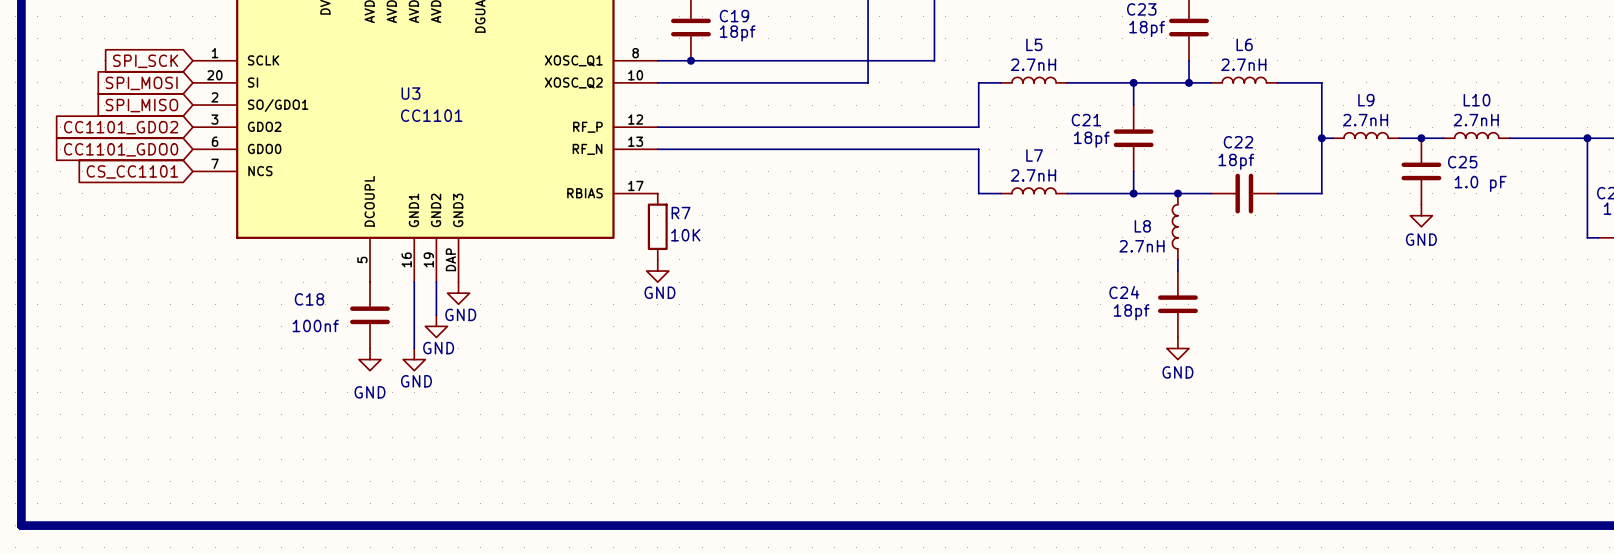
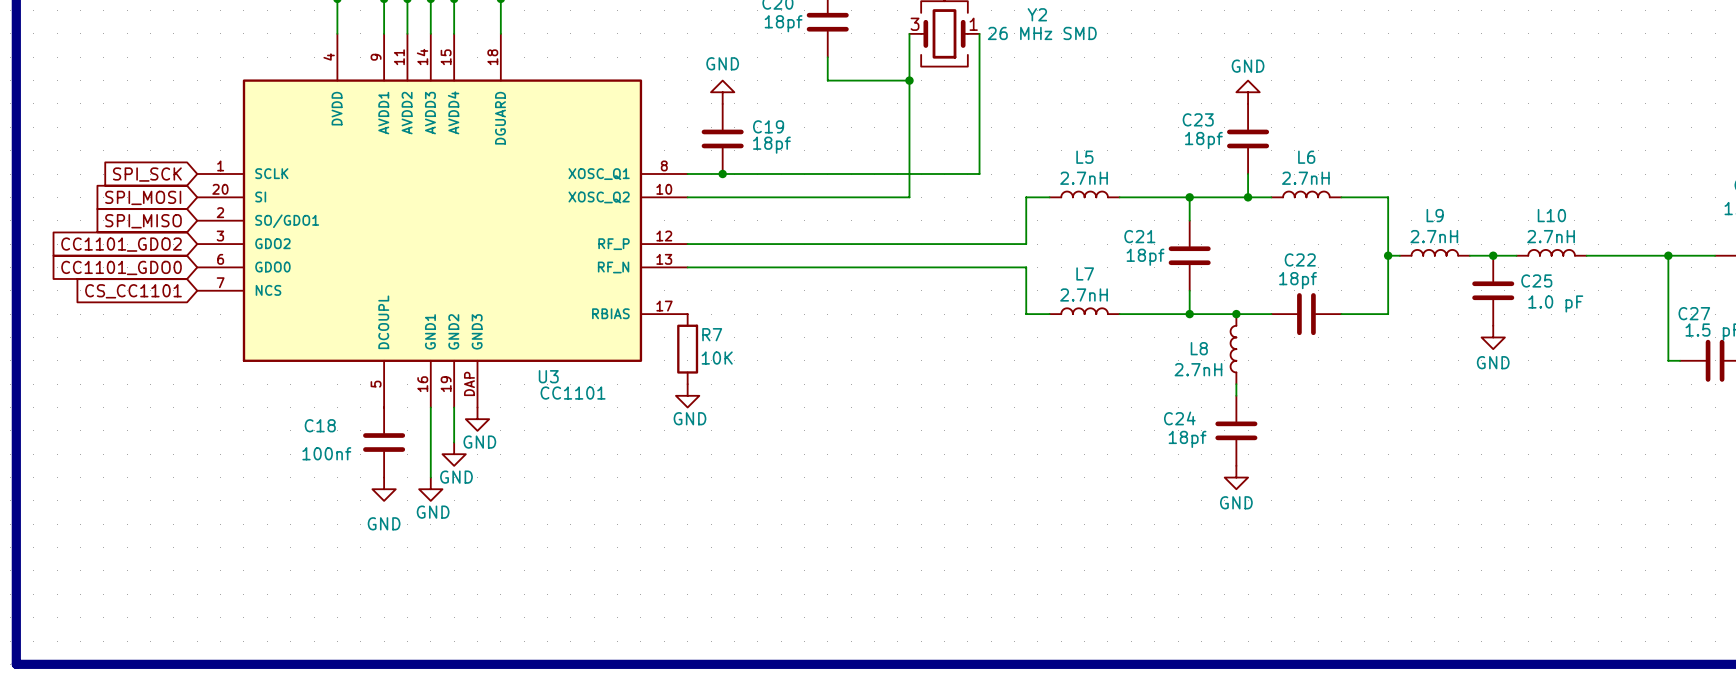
U3 name position: U3 (410, 93) -> U3 (548, 376)
U3 value position: CC1101 (431, 115) -> CC1101 (573, 393)

